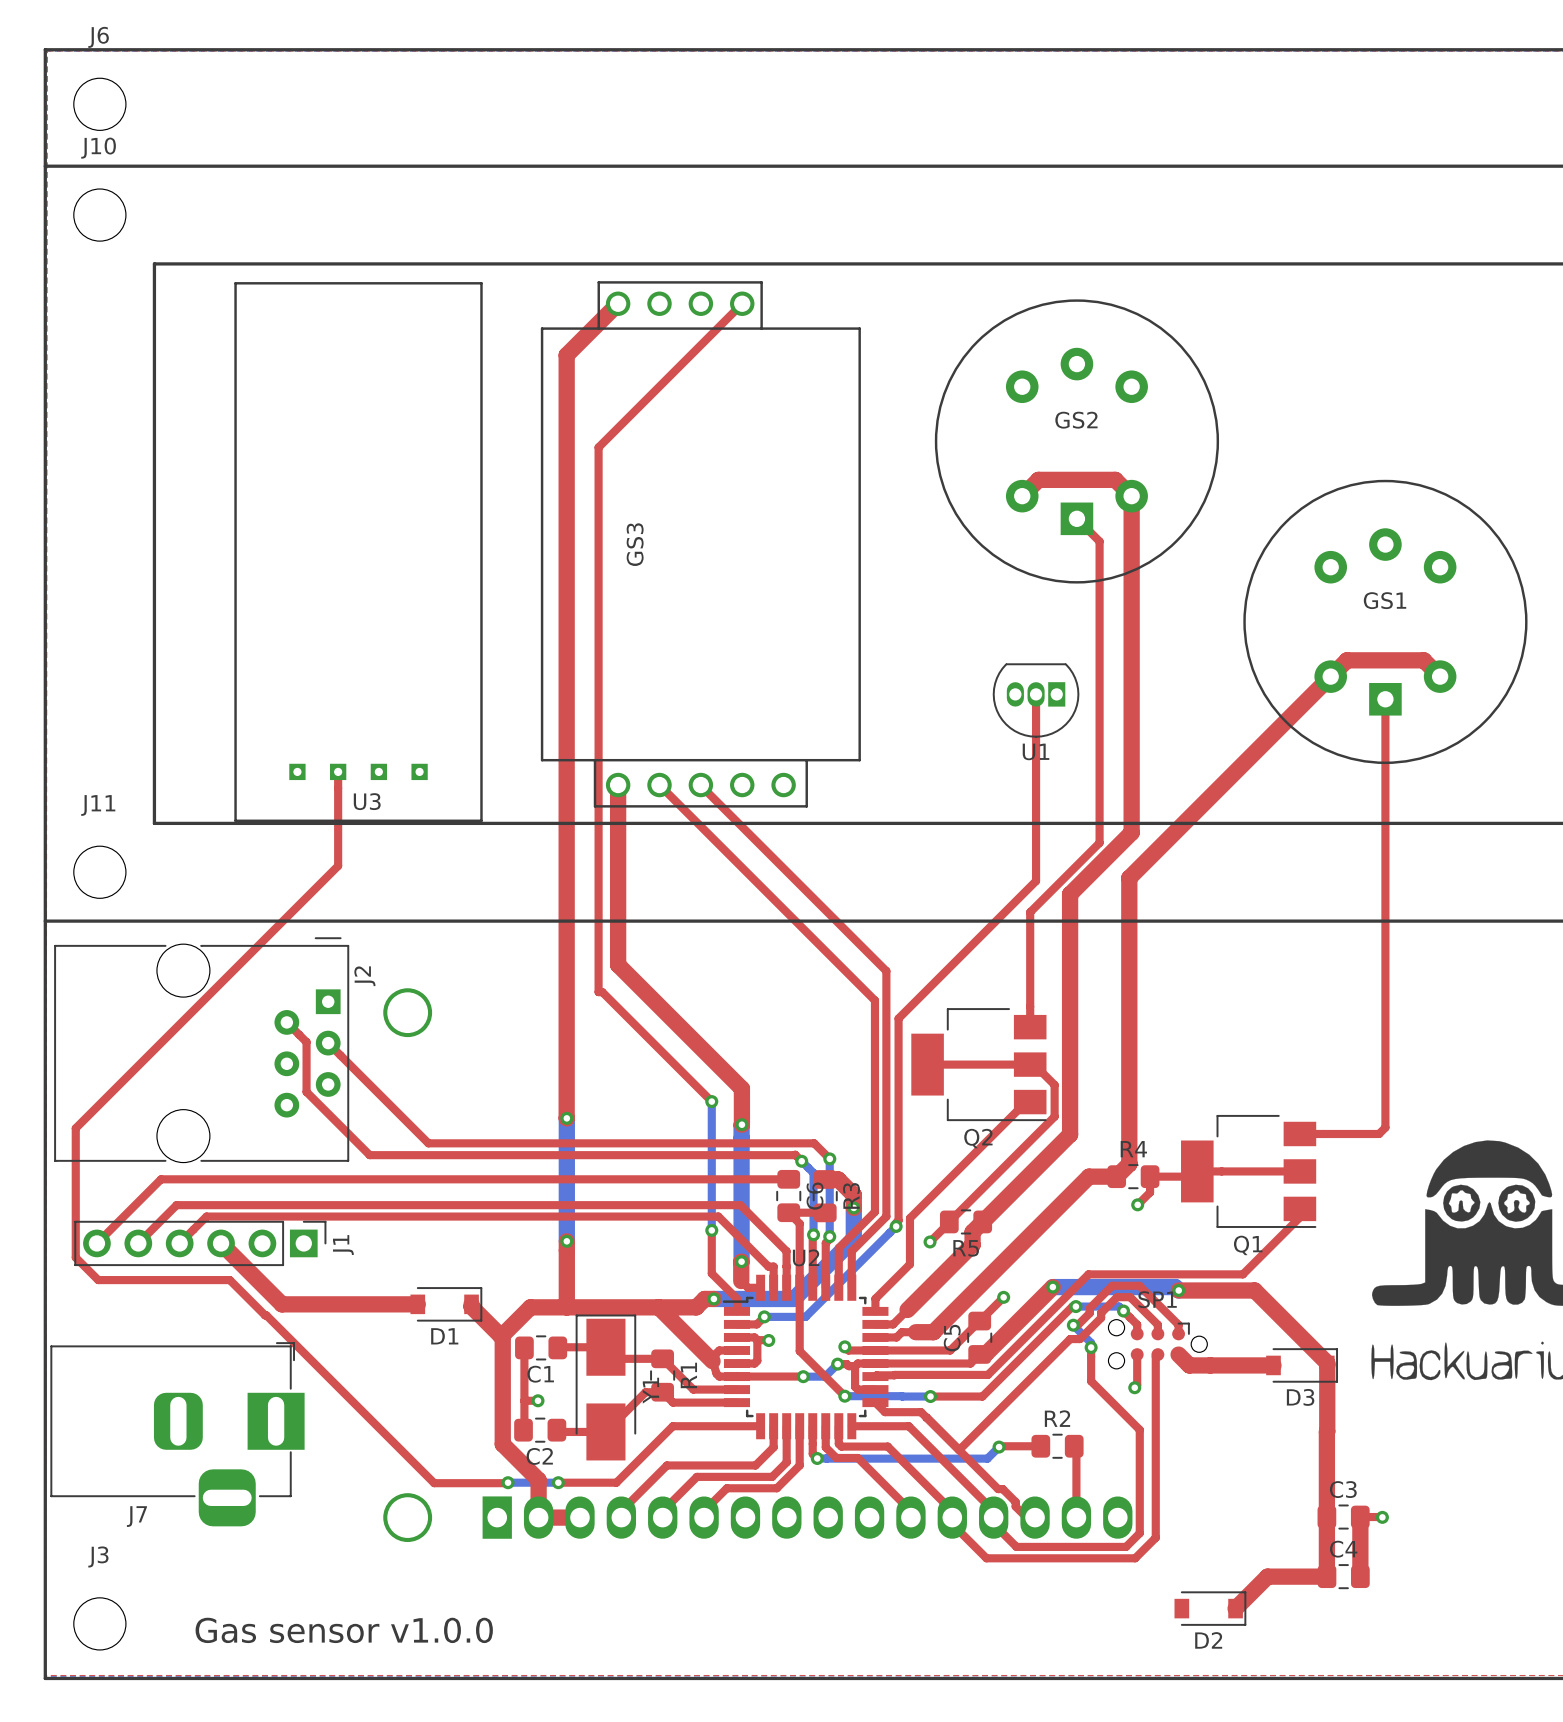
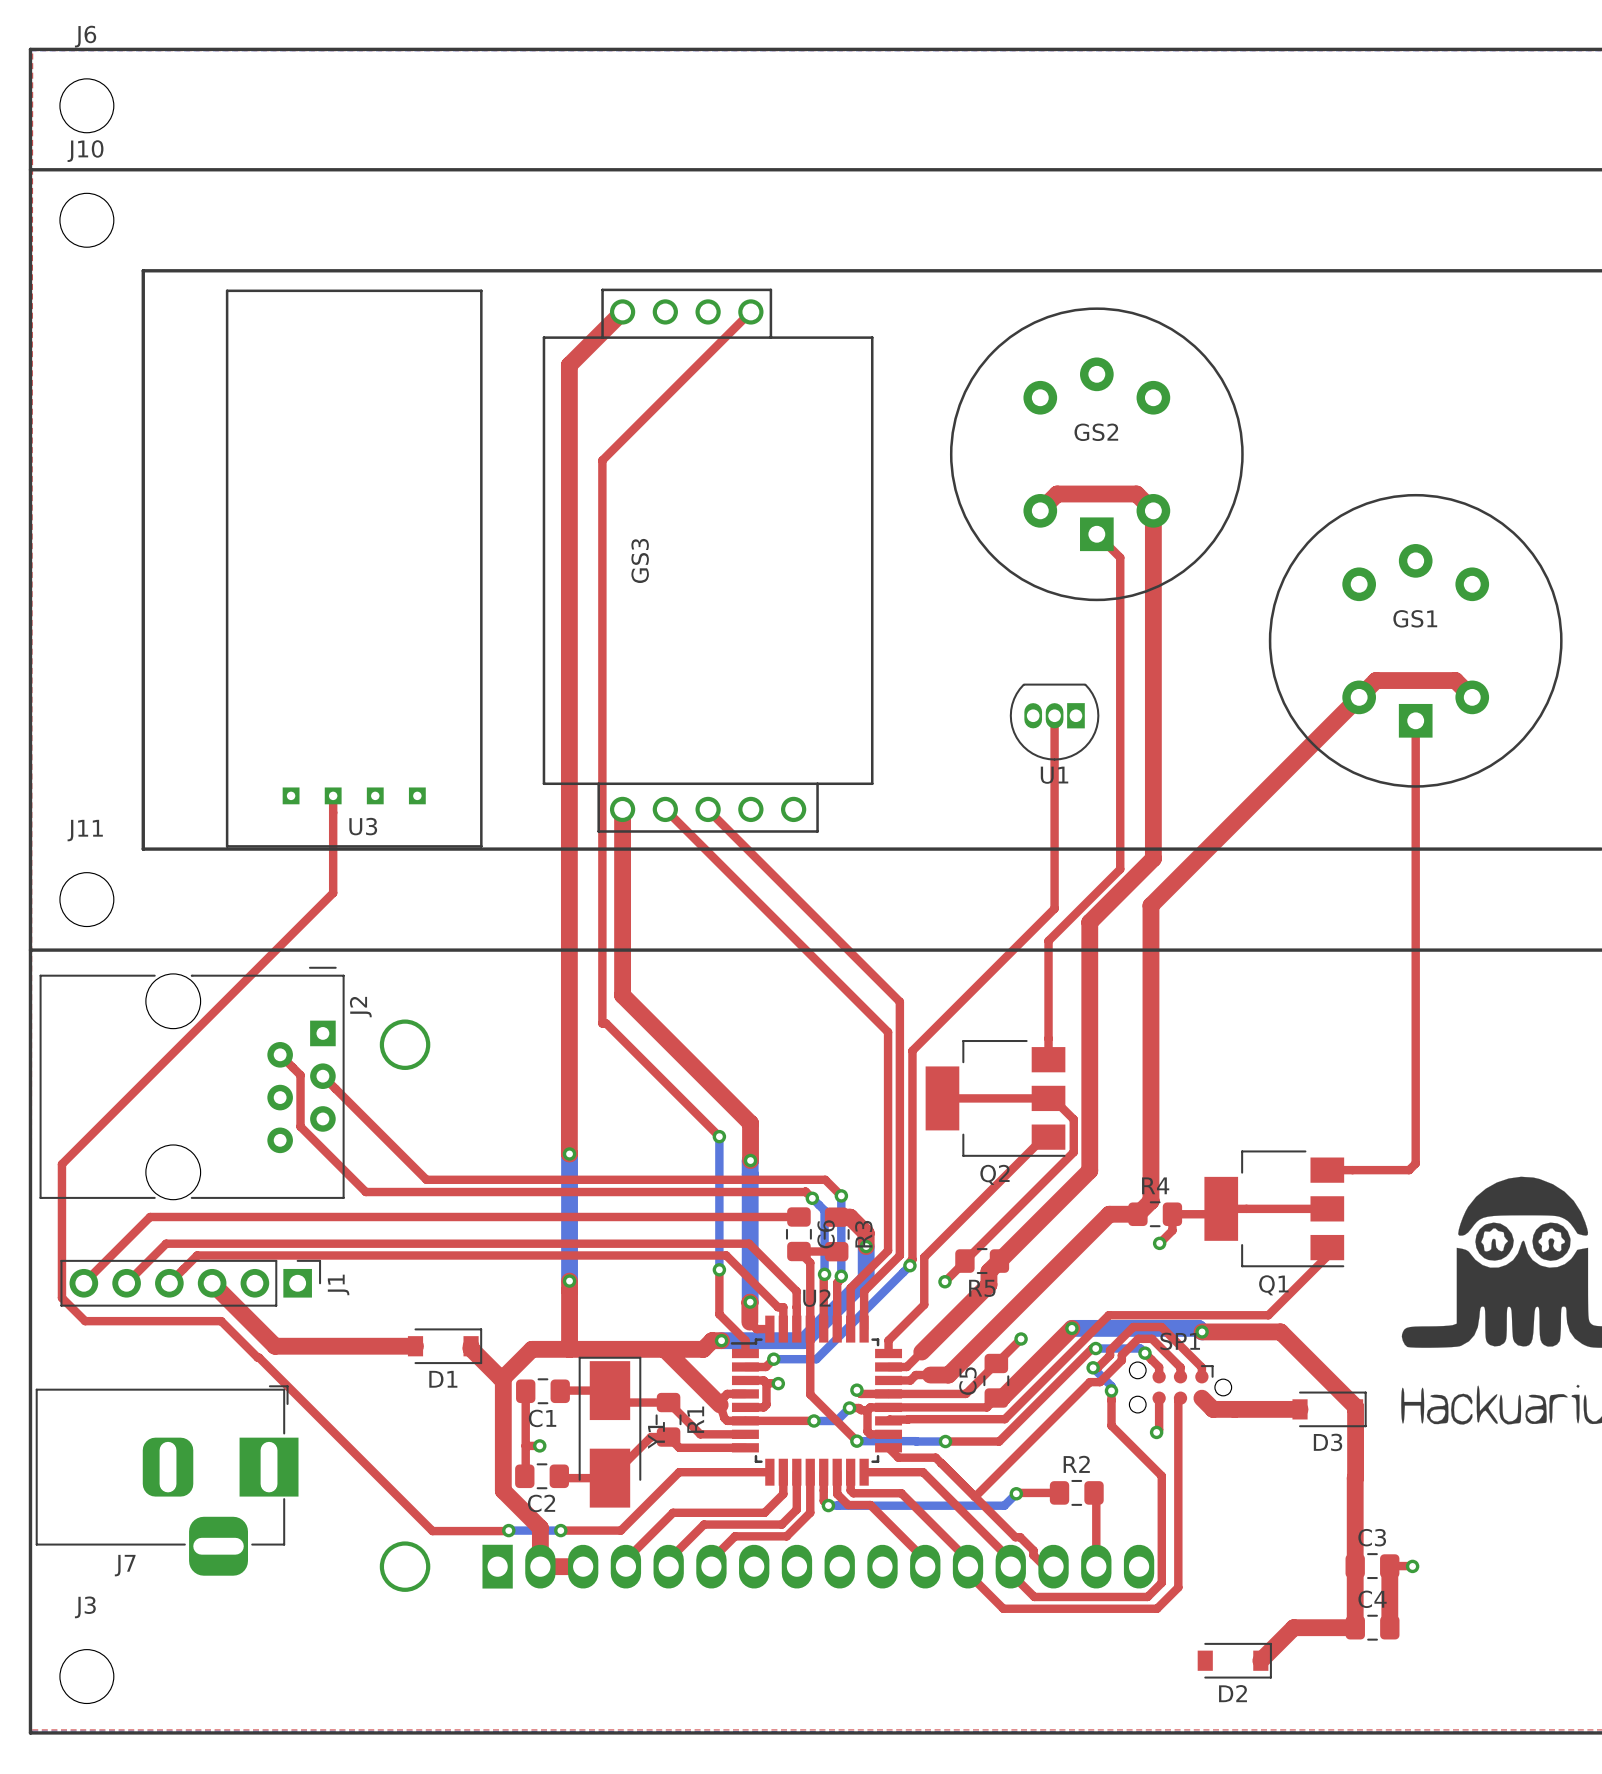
text: Gas sensor v1.0.0 (344, 1630) -> none

